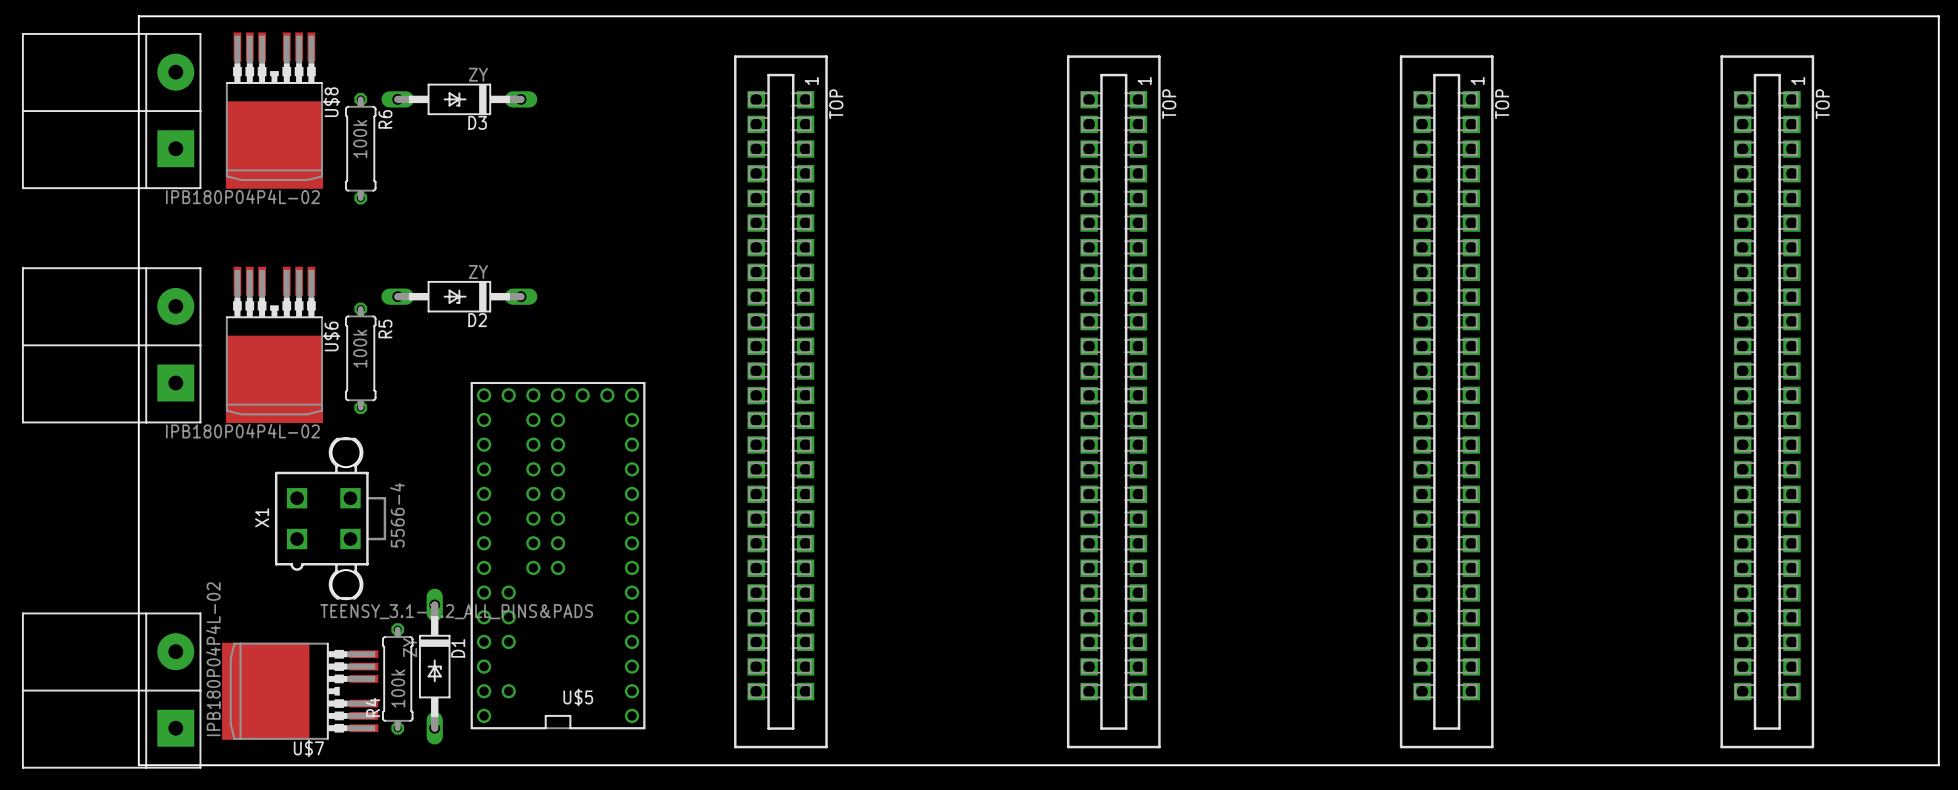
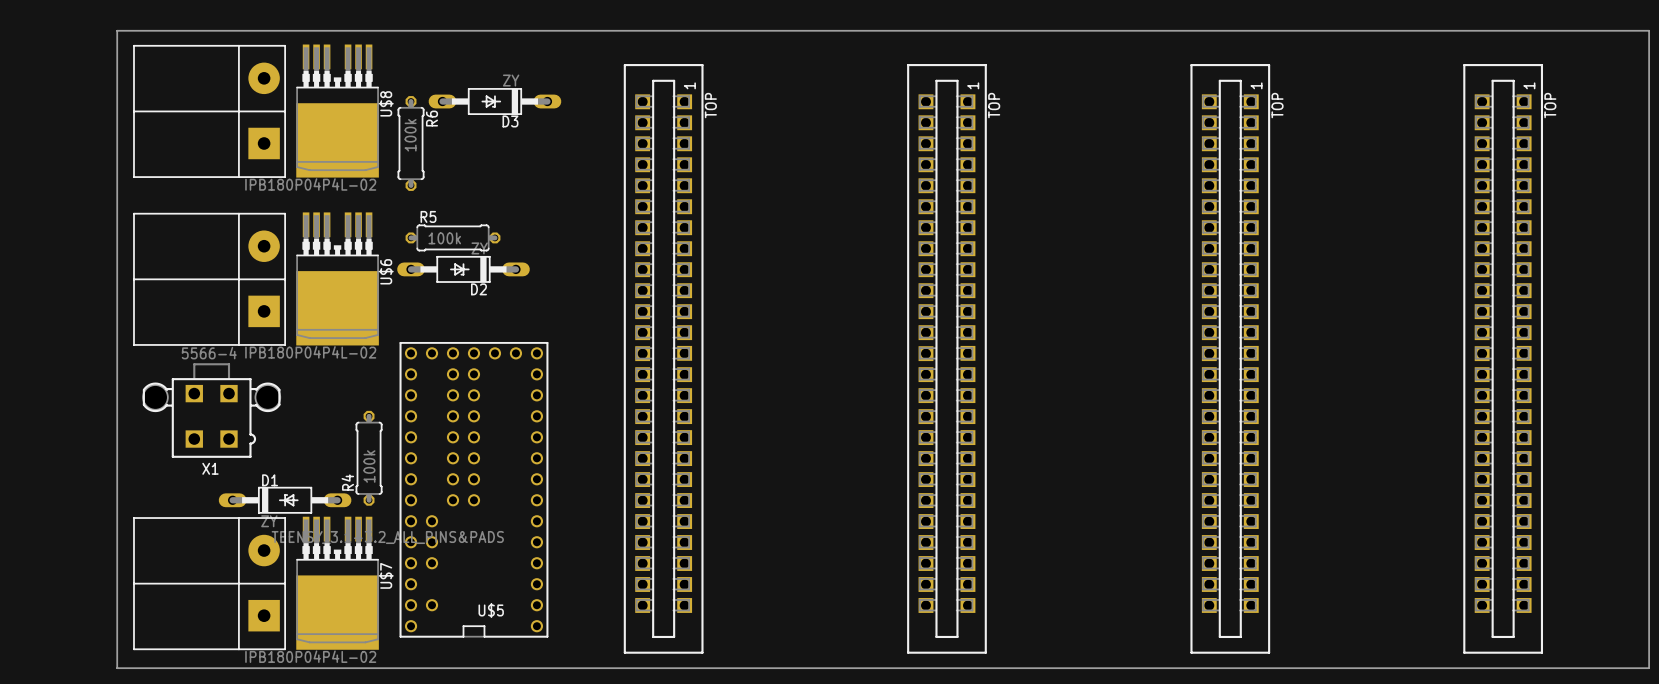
D3 position: (459, 99) -> (494, 101)
U$8 position: (274, 110) -> (337, 111)
part: (111, 111) -> none
part: none -> (209, 111)
R6 position: (360, 148) -> (411, 143)
D2 position: (459, 296) -> (463, 269)
part: none -> (209, 279)
R5 name position: R5 (385, 329) -> R5 (428, 216)
U$6 position: (274, 344) -> (337, 278)
part: (111, 345) -> none
R5 rotation: 0° (360, 358) -> 90° clockwise (452, 237)
R5 position: (360, 358) -> (452, 237)
X1 rotation: 0° (330, 518) -> 90° counterclockwise (211, 410)
X1 position: (330, 518) -> (211, 410)
D1 rotation: 0° (434, 666) -> 90° counterclockwise (285, 500)
D1 position: (434, 666) -> (285, 500)
R4 position: (397, 678) -> (369, 458)
part position: (111, 690) -> (209, 583)
U$7 rotation: 0° (300, 691) -> 90° counterclockwise (337, 583)
U$7 position: (300, 691) -> (337, 583)

